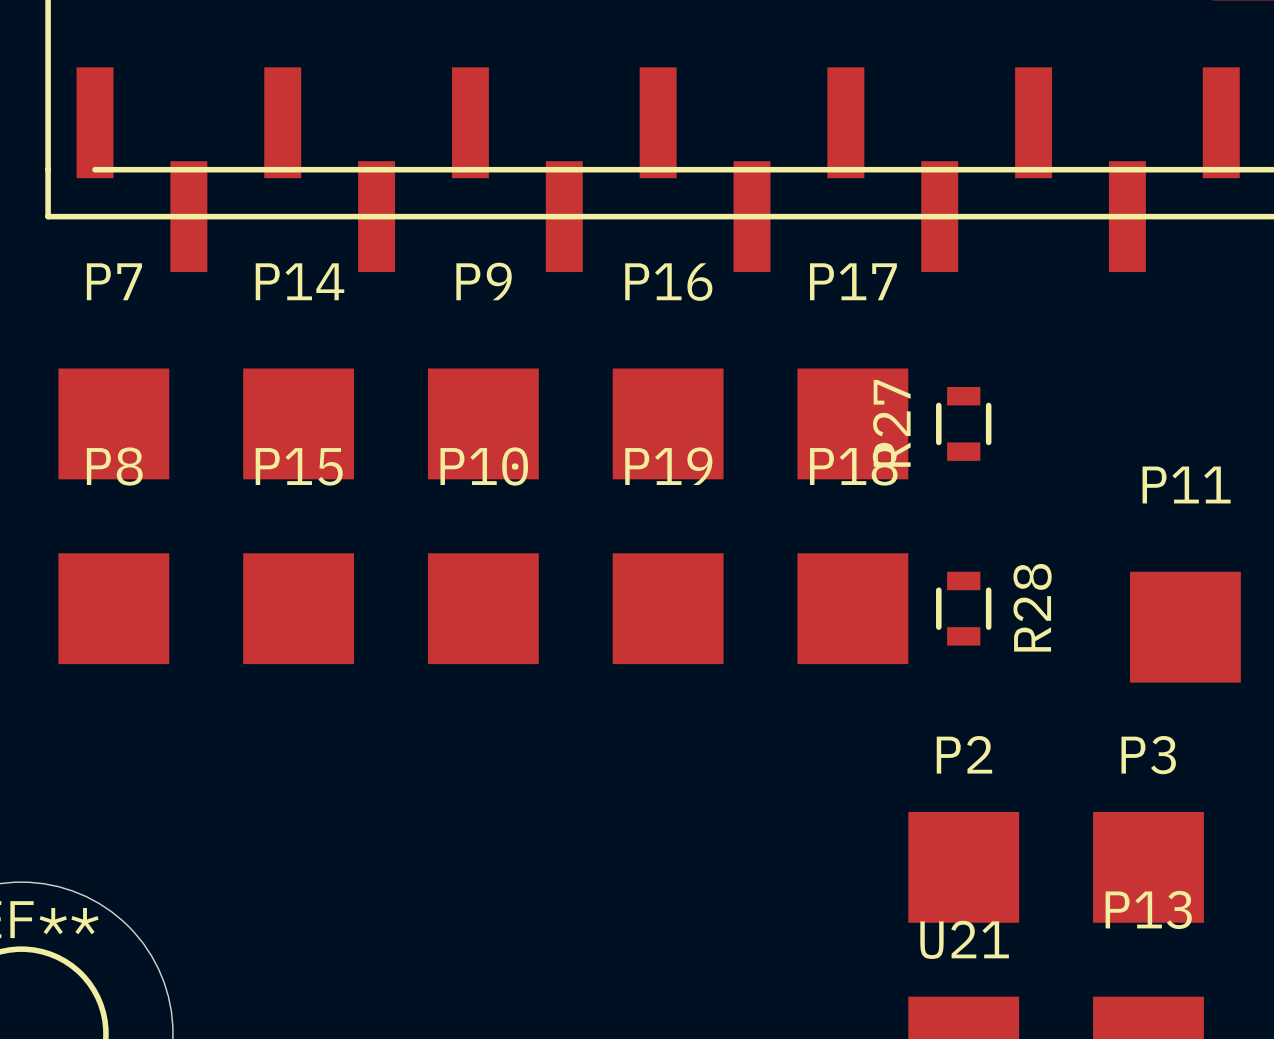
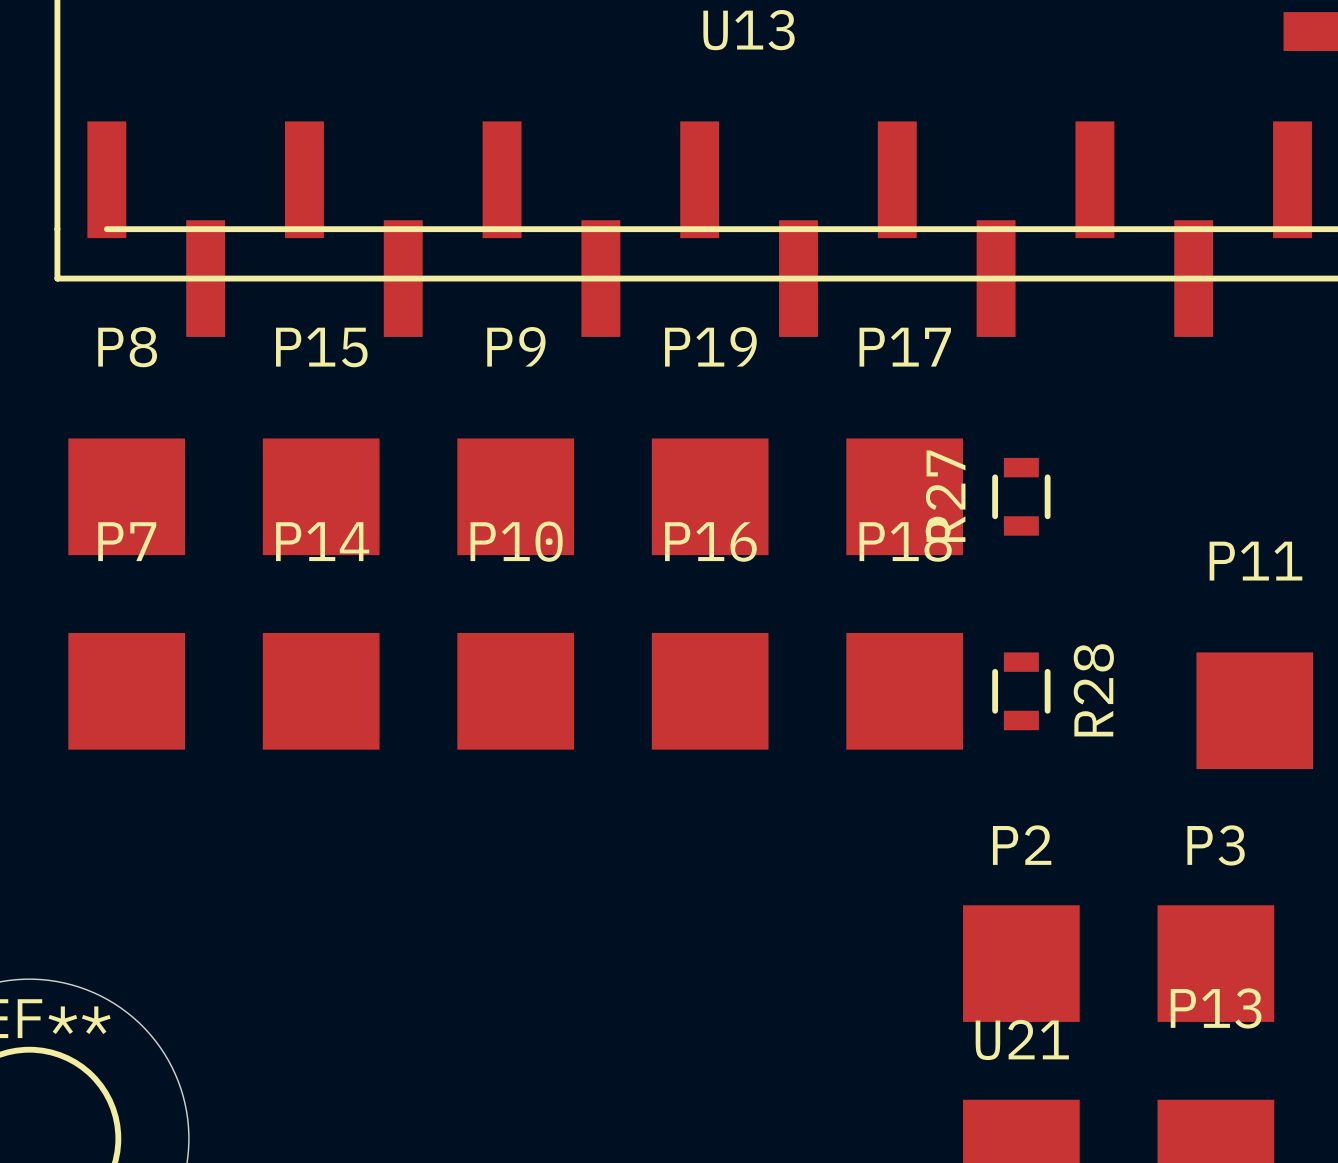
P7 name: P7 (114, 281) -> P8 (127, 347)
P14 name: P14 (299, 281) -> P15 (321, 347)
P16 name: P16 (668, 282) -> P19 (710, 346)
P8 name: P8 (114, 466) -> P7 (127, 541)
P15 name: P15 (299, 466) -> P14 (322, 541)
P19 name: P19 (668, 466) -> P16 (710, 541)

